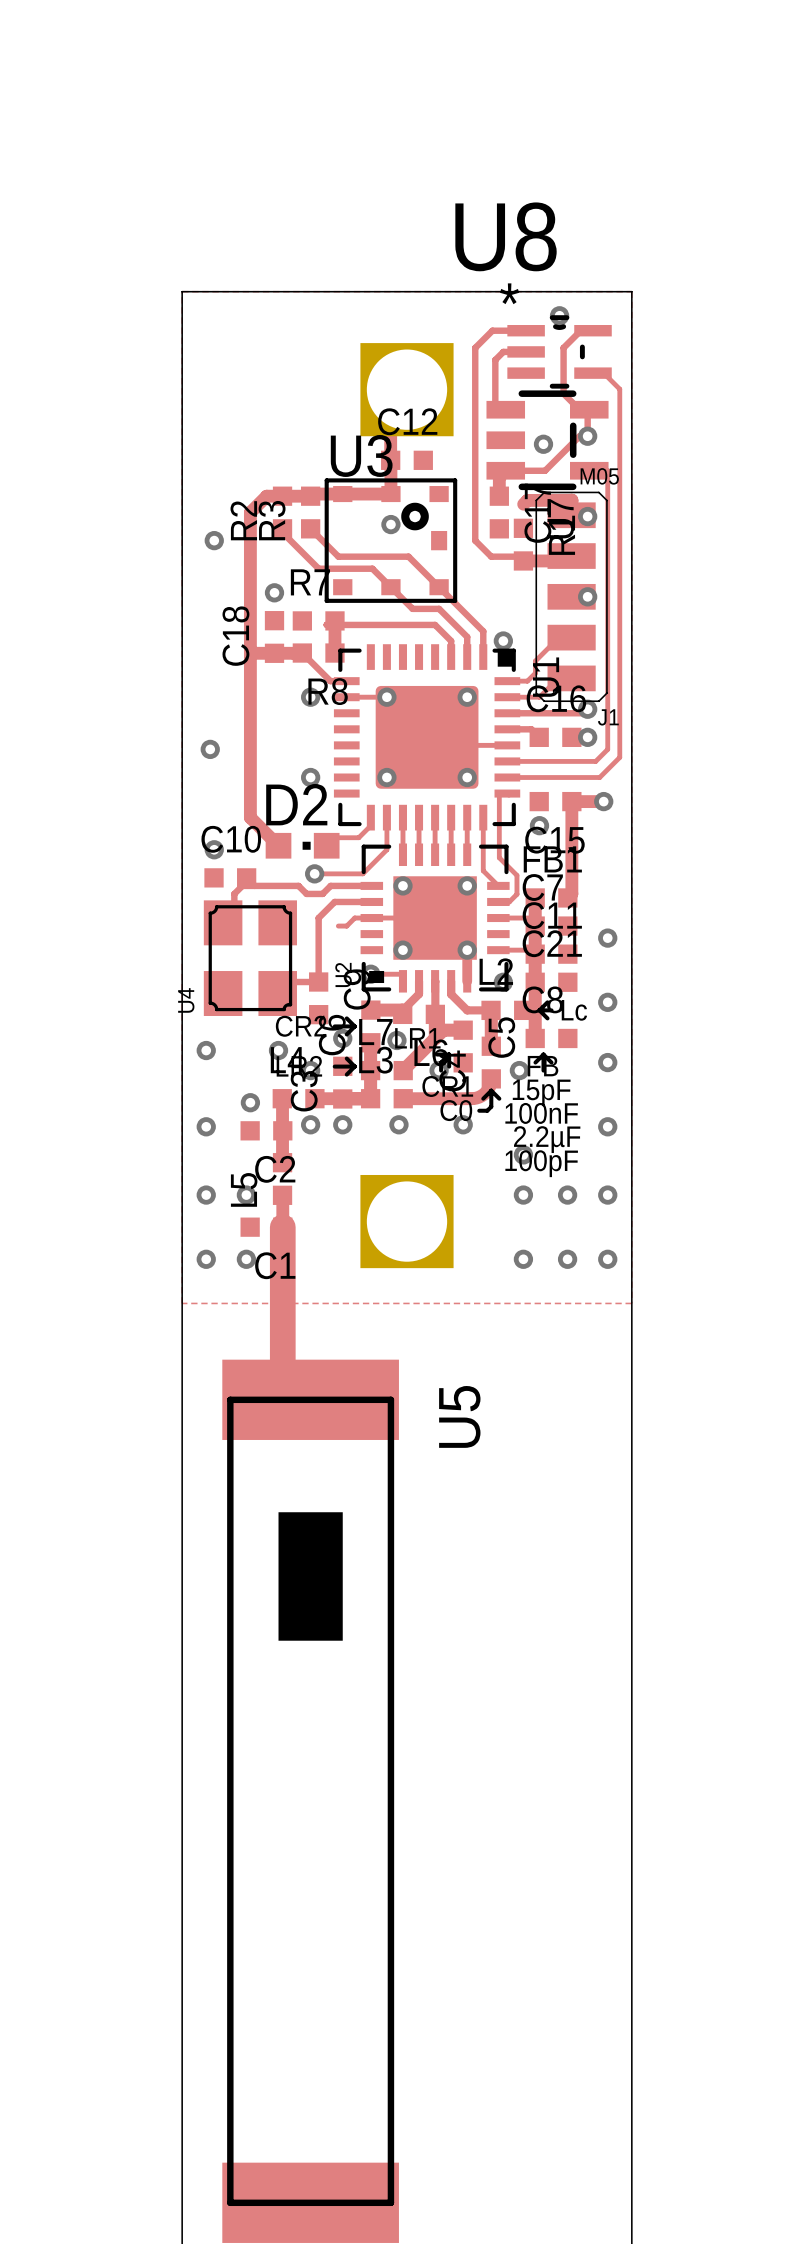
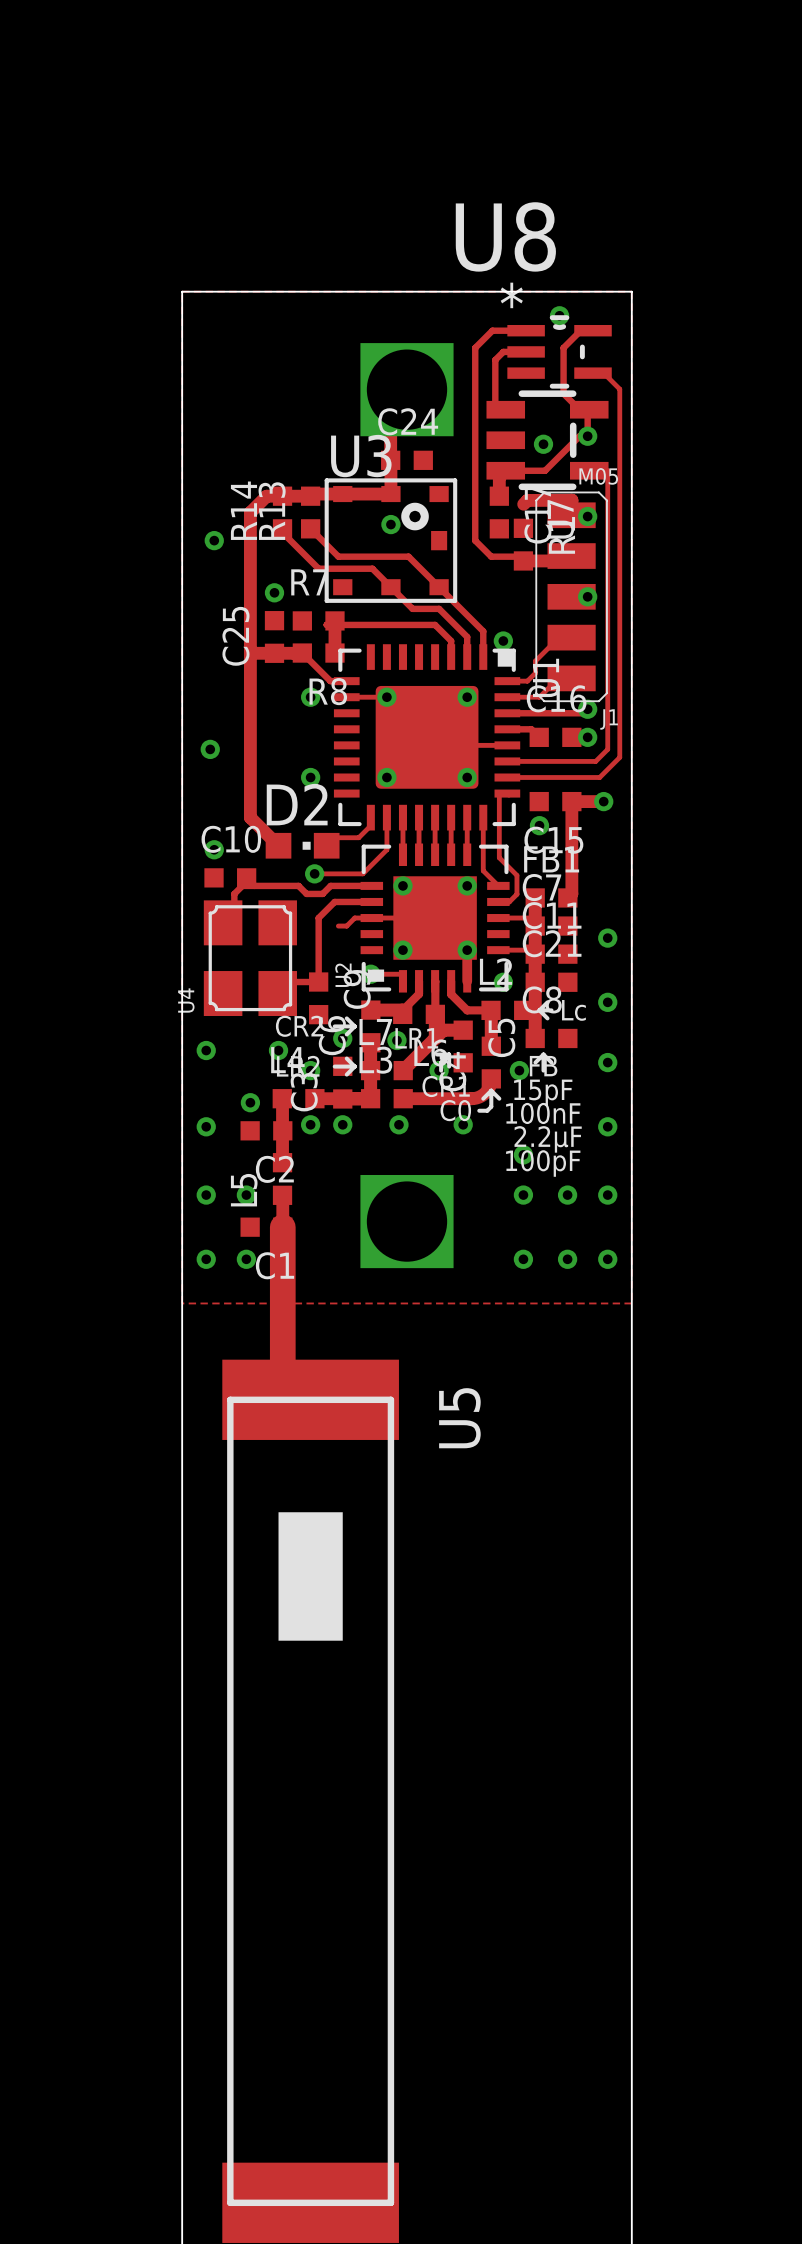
C12 name: C12 (407, 421) -> C24 (408, 421)
R2 name: R2 (243, 520) -> R14 (243, 510)
R3 name: R3 (272, 520) -> R13 (272, 511)
C18 name: C18 (235, 636) -> C25 (235, 636)

